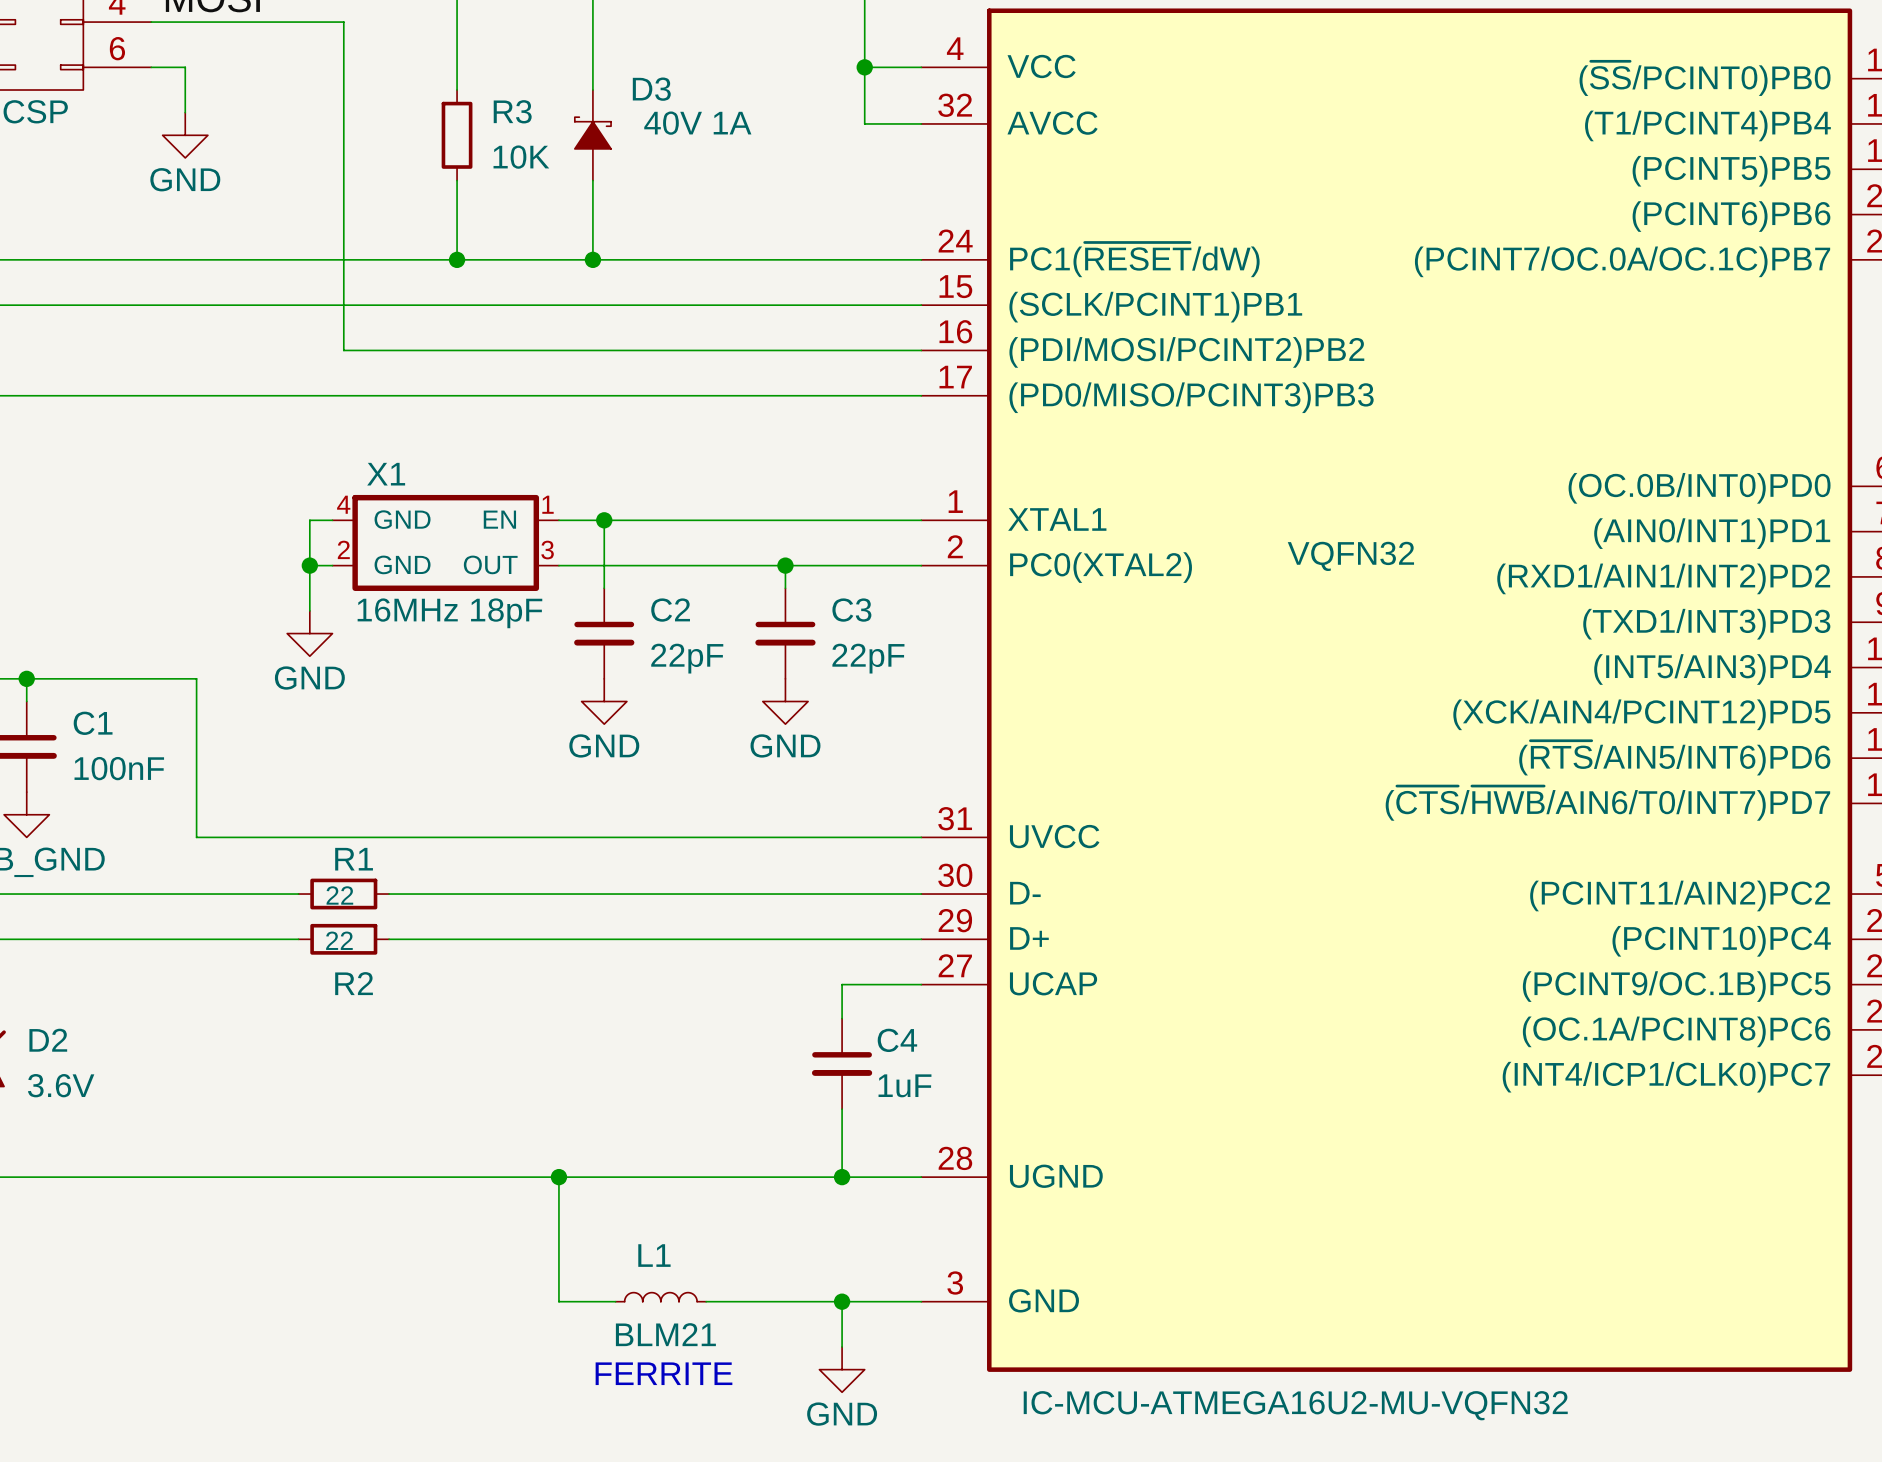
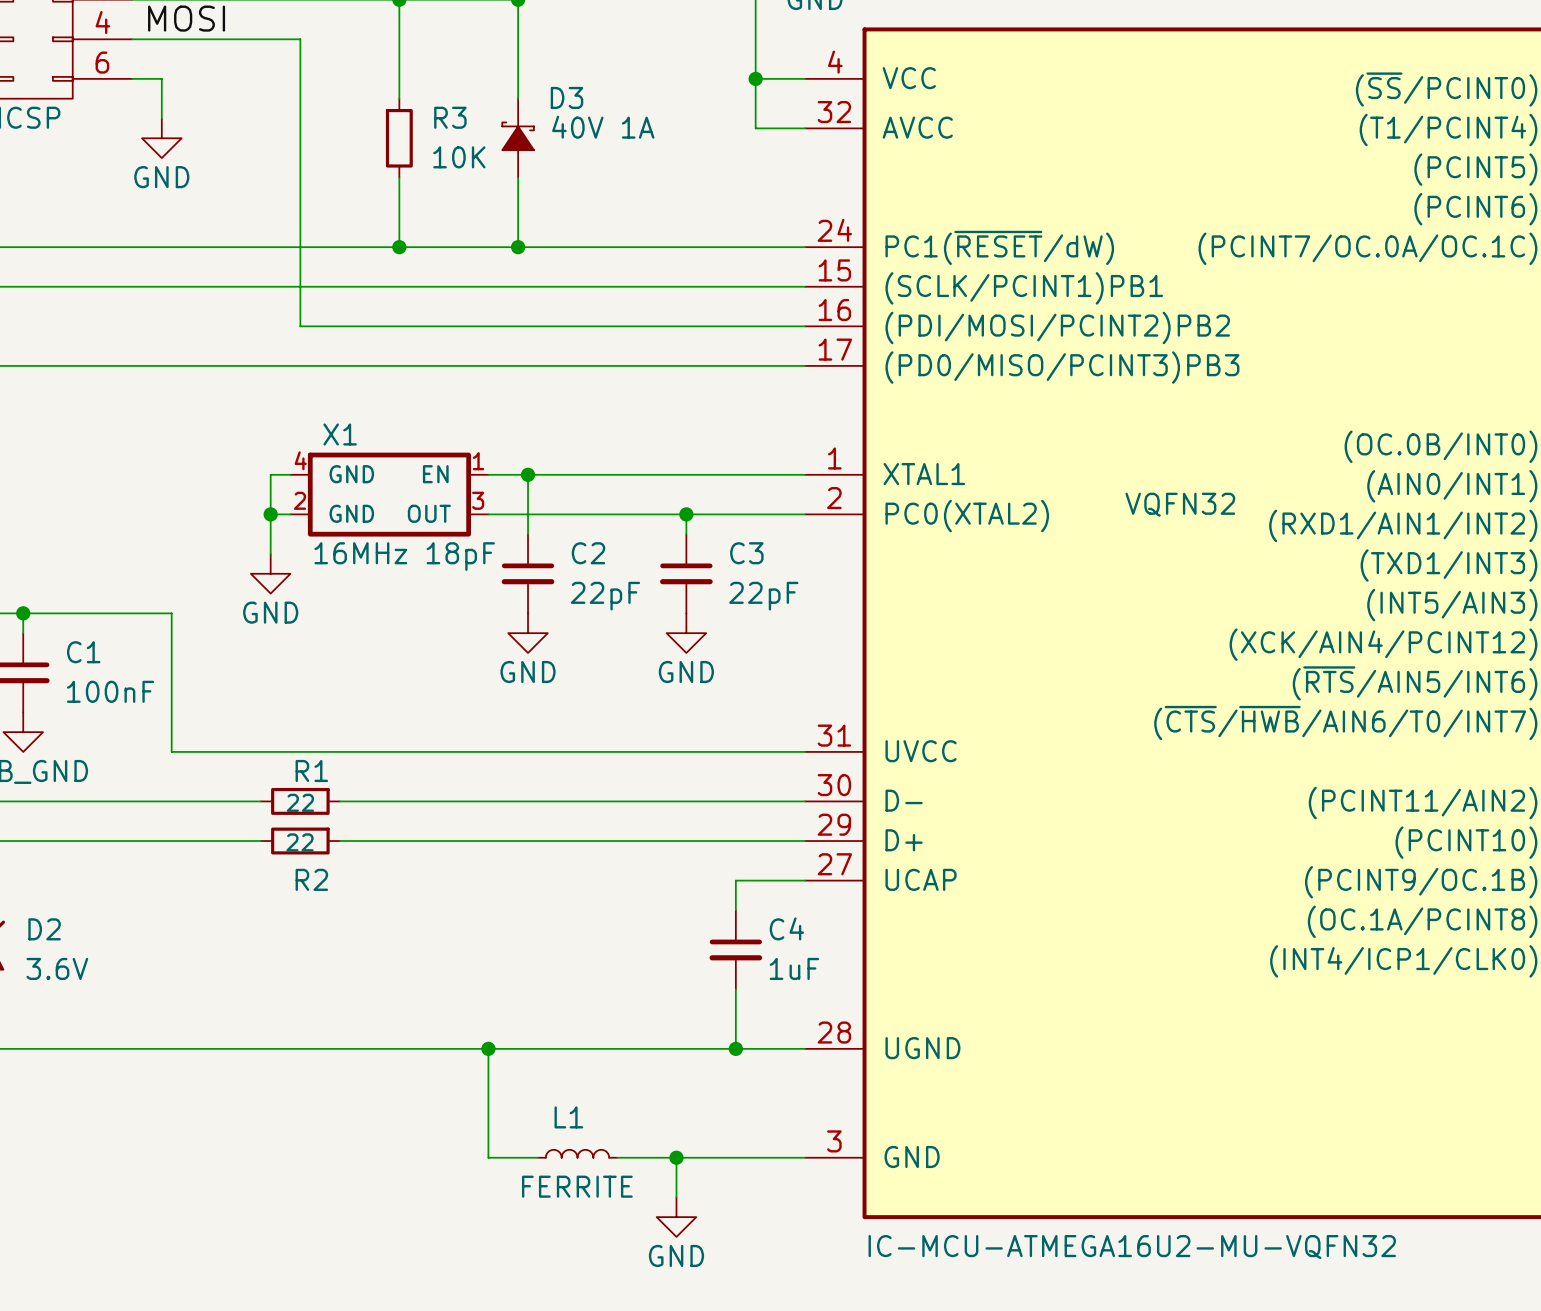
wire: (842, 1301) (842, 1346) -> (676, 1157) (676, 1197)
junction position: (842, 1301) -> (676, 1157)
L1 value: BLM21 (665, 1334) -> FERRITE (577, 1186)
power symbol position: GND (842, 1369) -> GND (676, 1217)
text: FERRITE (663, 1373) -> none

